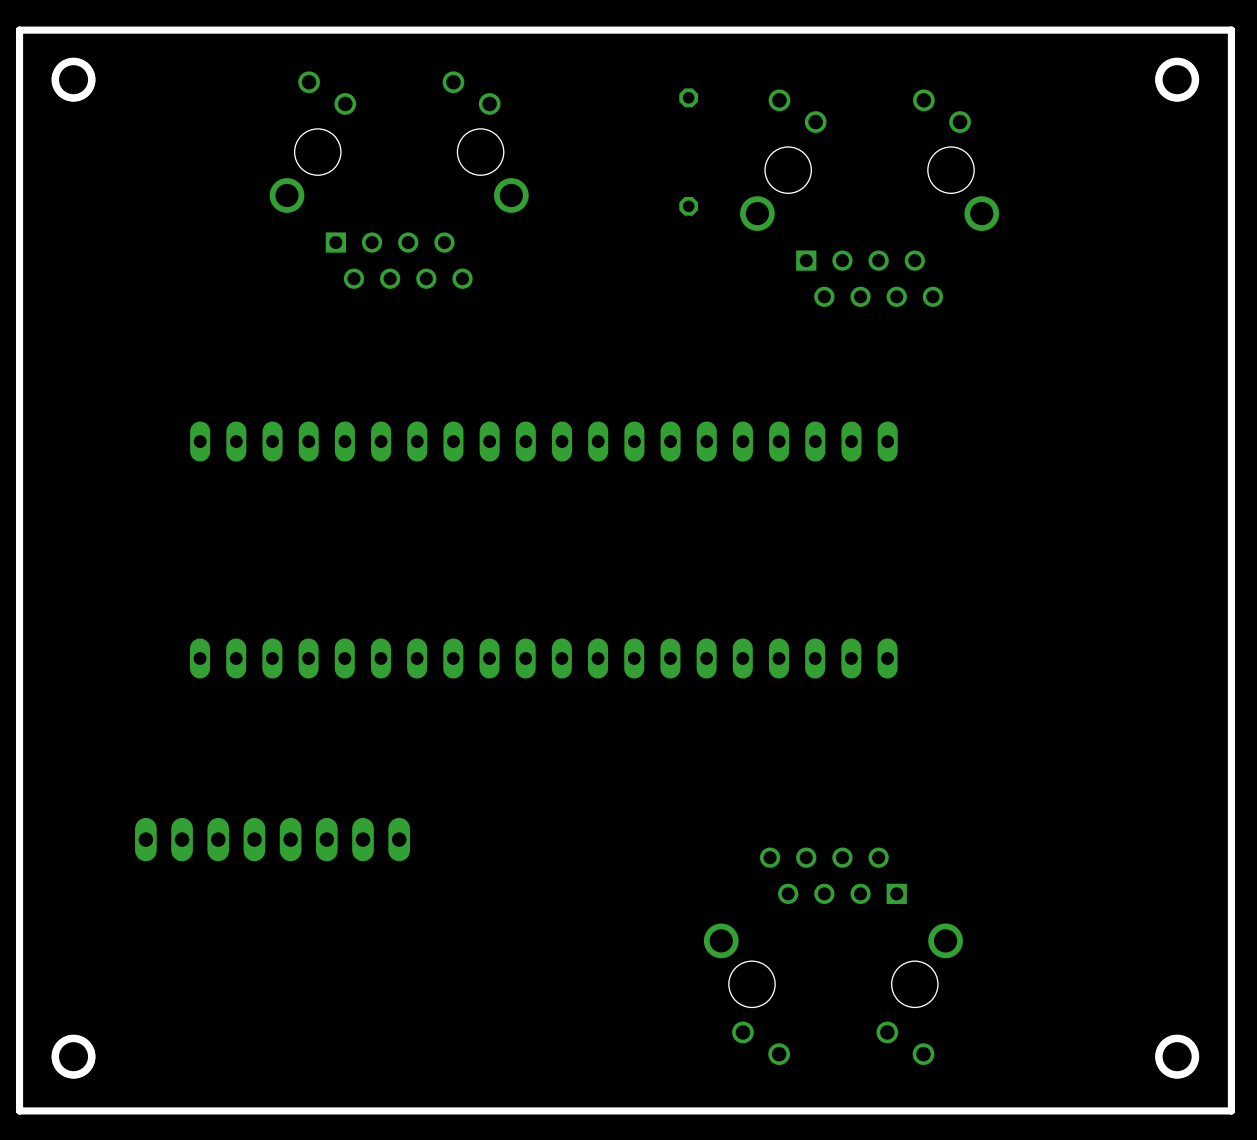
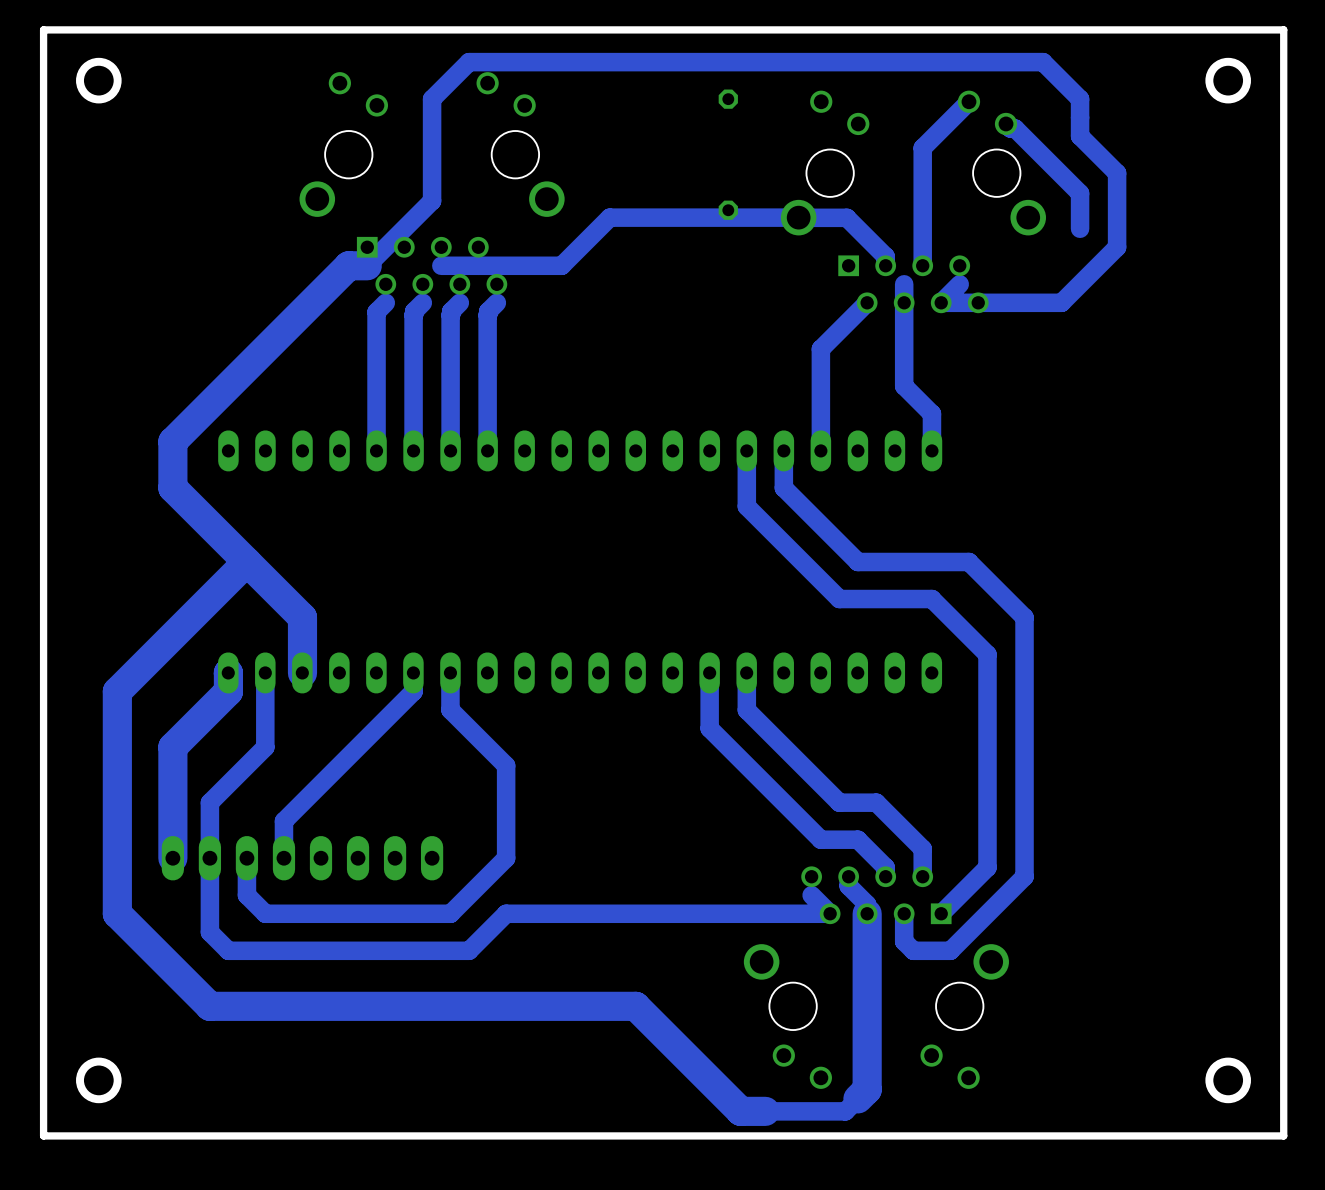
track: none -> (968, 101) (922, 148) (922, 265)
track: none -> (1006, 123) (1010, 128) (1015, 128) (1080, 193) (1080, 228)
track: none -> (811, 217) (609, 217) (561, 265) (441, 265)
track: none -> (811, 217) (846, 217) (885, 256) (885, 265)
track: none -> (904, 284) (904, 386) (931, 413) (931, 450)
track: none -> (959, 284) (941, 302) (1061, 302) (1117, 247) (1117, 173) (1080, 136) (1080, 99) (1043, 62) (469, 62) (432, 99) (432, 200) (367, 265) (348, 265) (172, 441) (172, 487) (302, 617) (302, 673)
track: none -> (385, 302) (376, 312) (376, 450)
track: none -> (422, 302) (414, 311) (413, 315) (413, 450)
track: none -> (459, 302) (451, 311) (450, 315) (450, 450)
track: none -> (496, 302) (488, 311) (487, 315) (487, 450)
track: none -> (867, 302) (820, 349) (820, 450)
track: none -> (746, 450) (746, 506) (839, 599) (931, 599) (987, 654) (987, 867) (941, 913)
track: none -> (783, 450) (783, 487) (857, 562) (968, 562) (1024, 617) (1024, 876) (950, 950) (913, 950) (904, 941) (904, 913)
track: none -> (246, 562) (117, 691) (117, 913) (209, 1006) (635, 1006) (740, 1111) (845, 1111) (867, 1089) (867, 904) (848, 886) (848, 876)
track: none -> (228, 673) (228, 691) (172, 747) (172, 858)
track: none -> (265, 672) (265, 747) (209, 802) (209, 932) (228, 950) (469, 950) (506, 913) (830, 913) (811, 895)
track: none -> (413, 673) (413, 691) (283, 821) (283, 858)
track: none -> (450, 672) (450, 709) (506, 765) (506, 858) (450, 913) (265, 913) (246, 895) (246, 858)
track: none -> (709, 672) (709, 728) (820, 839) (857, 839) (885, 867) (885, 876)
track: none -> (746, 673) (746, 710) (839, 802) (876, 802) (922, 848) (922, 876)

